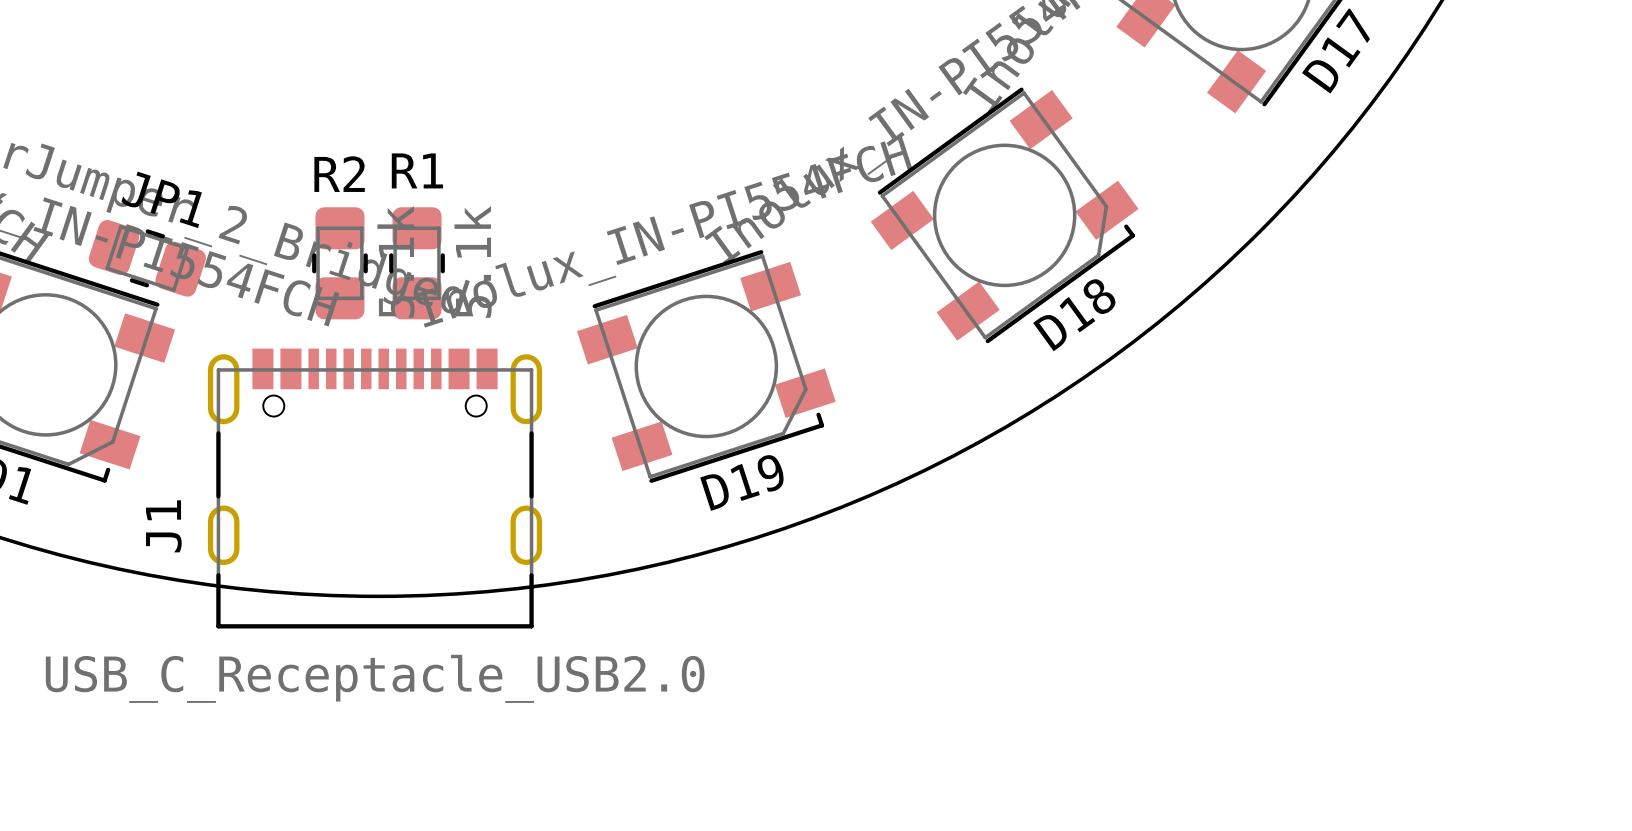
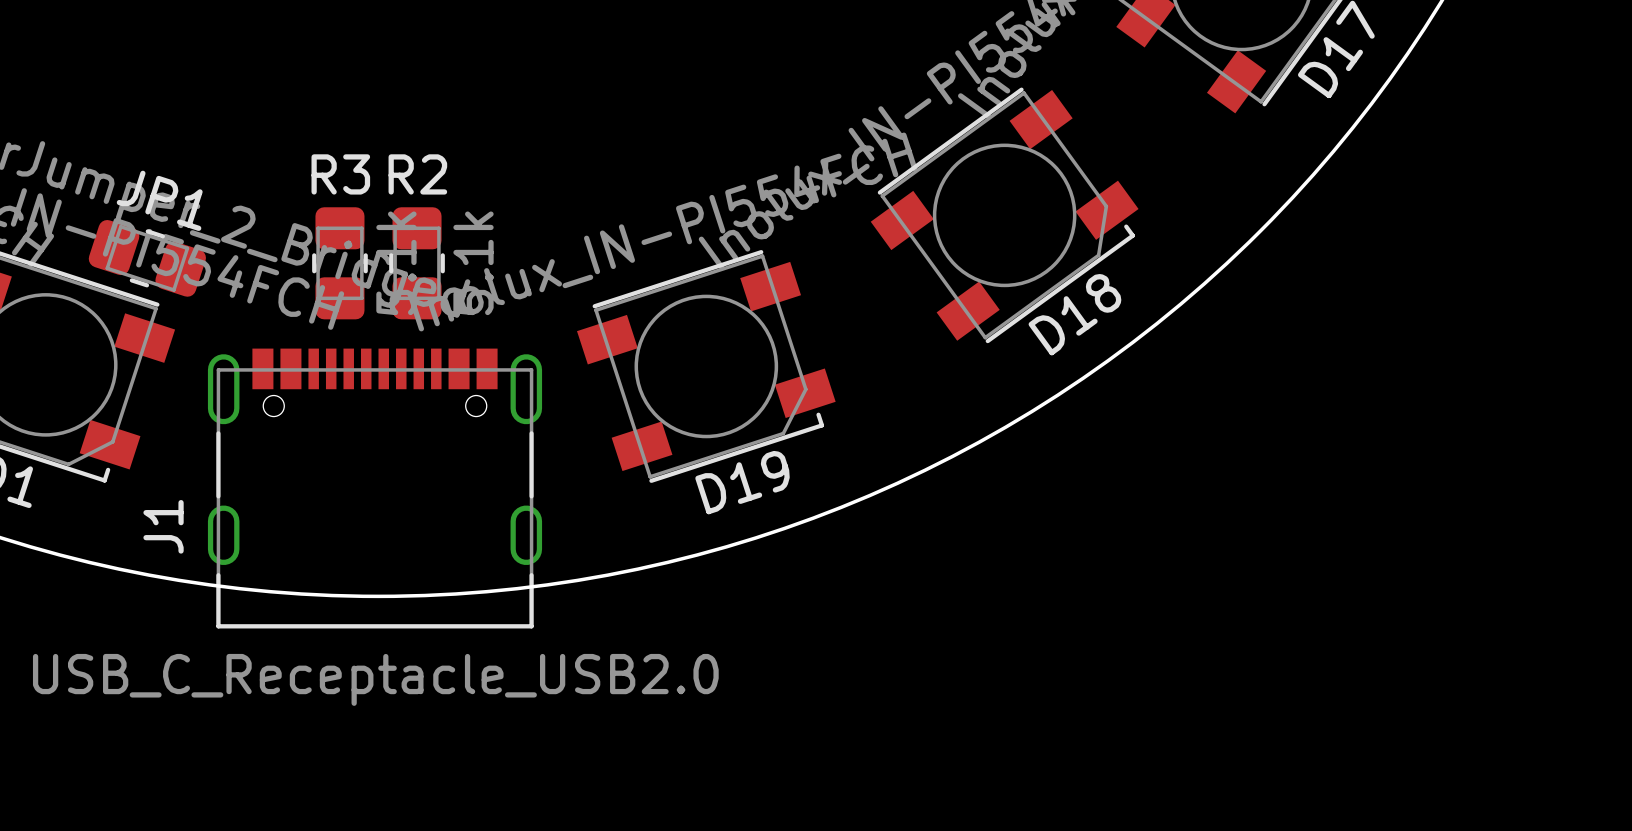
R1 name: R1 (417, 170) -> R2 (417, 174)
R2 name: R2 (339, 174) -> R3 (340, 174)

